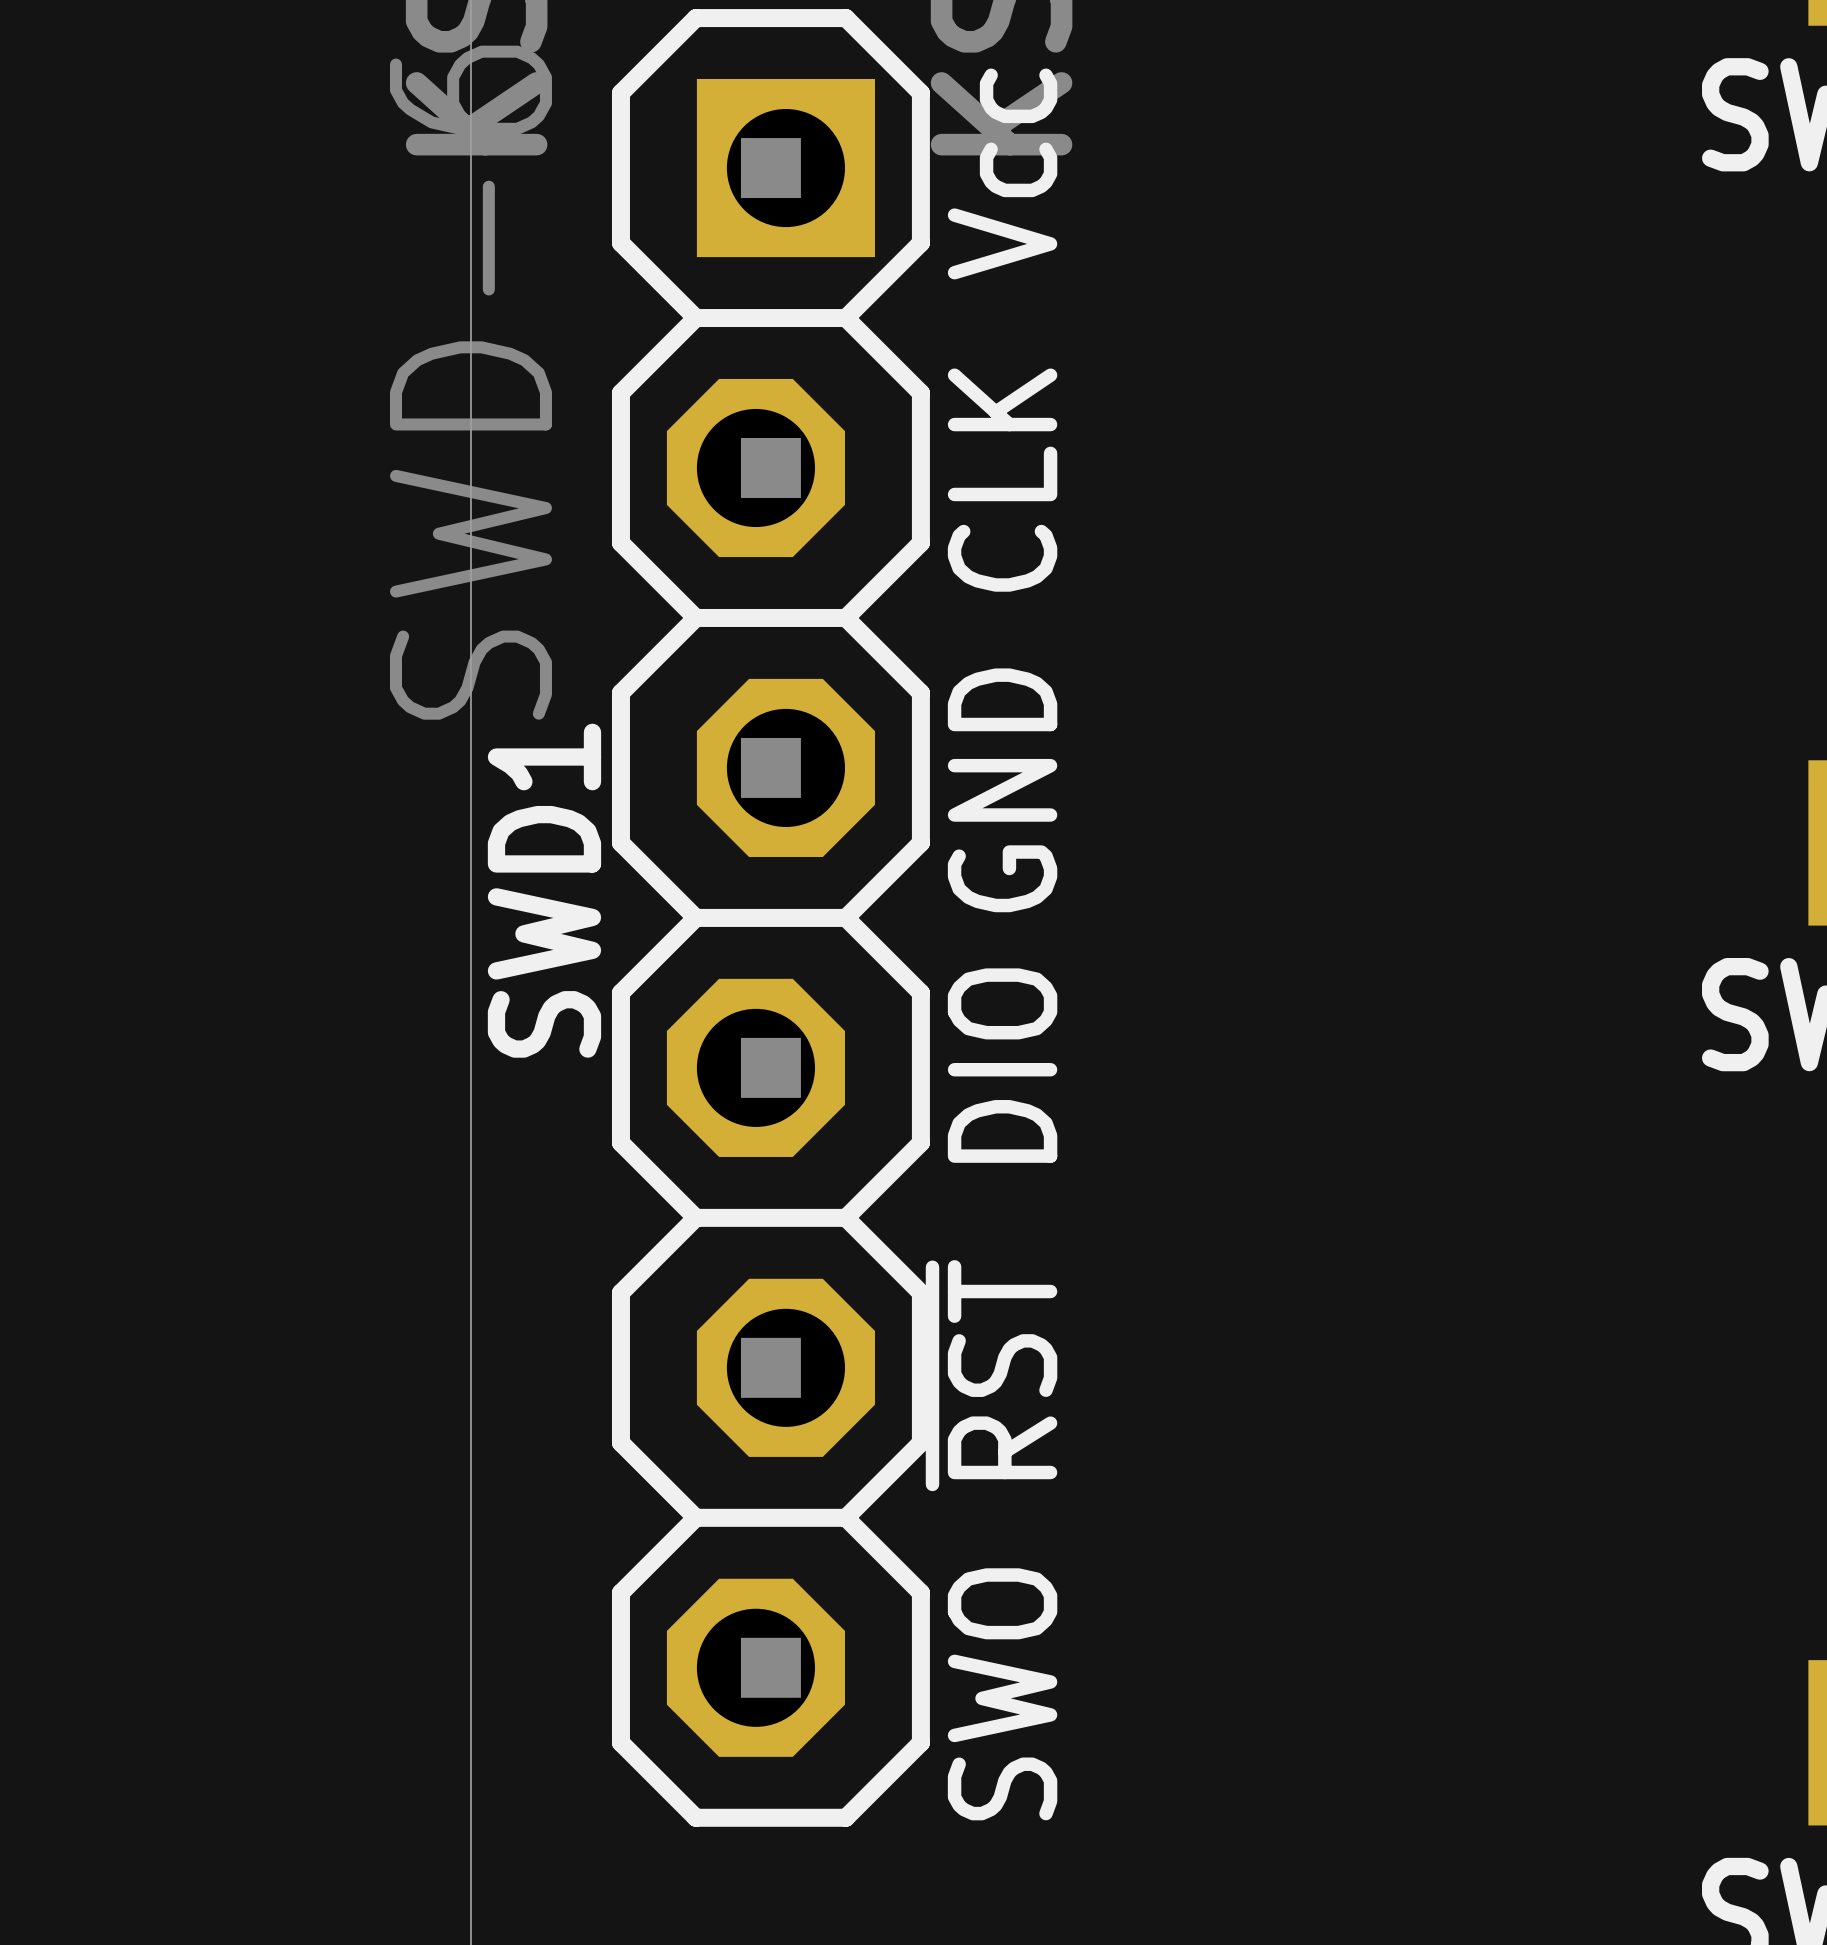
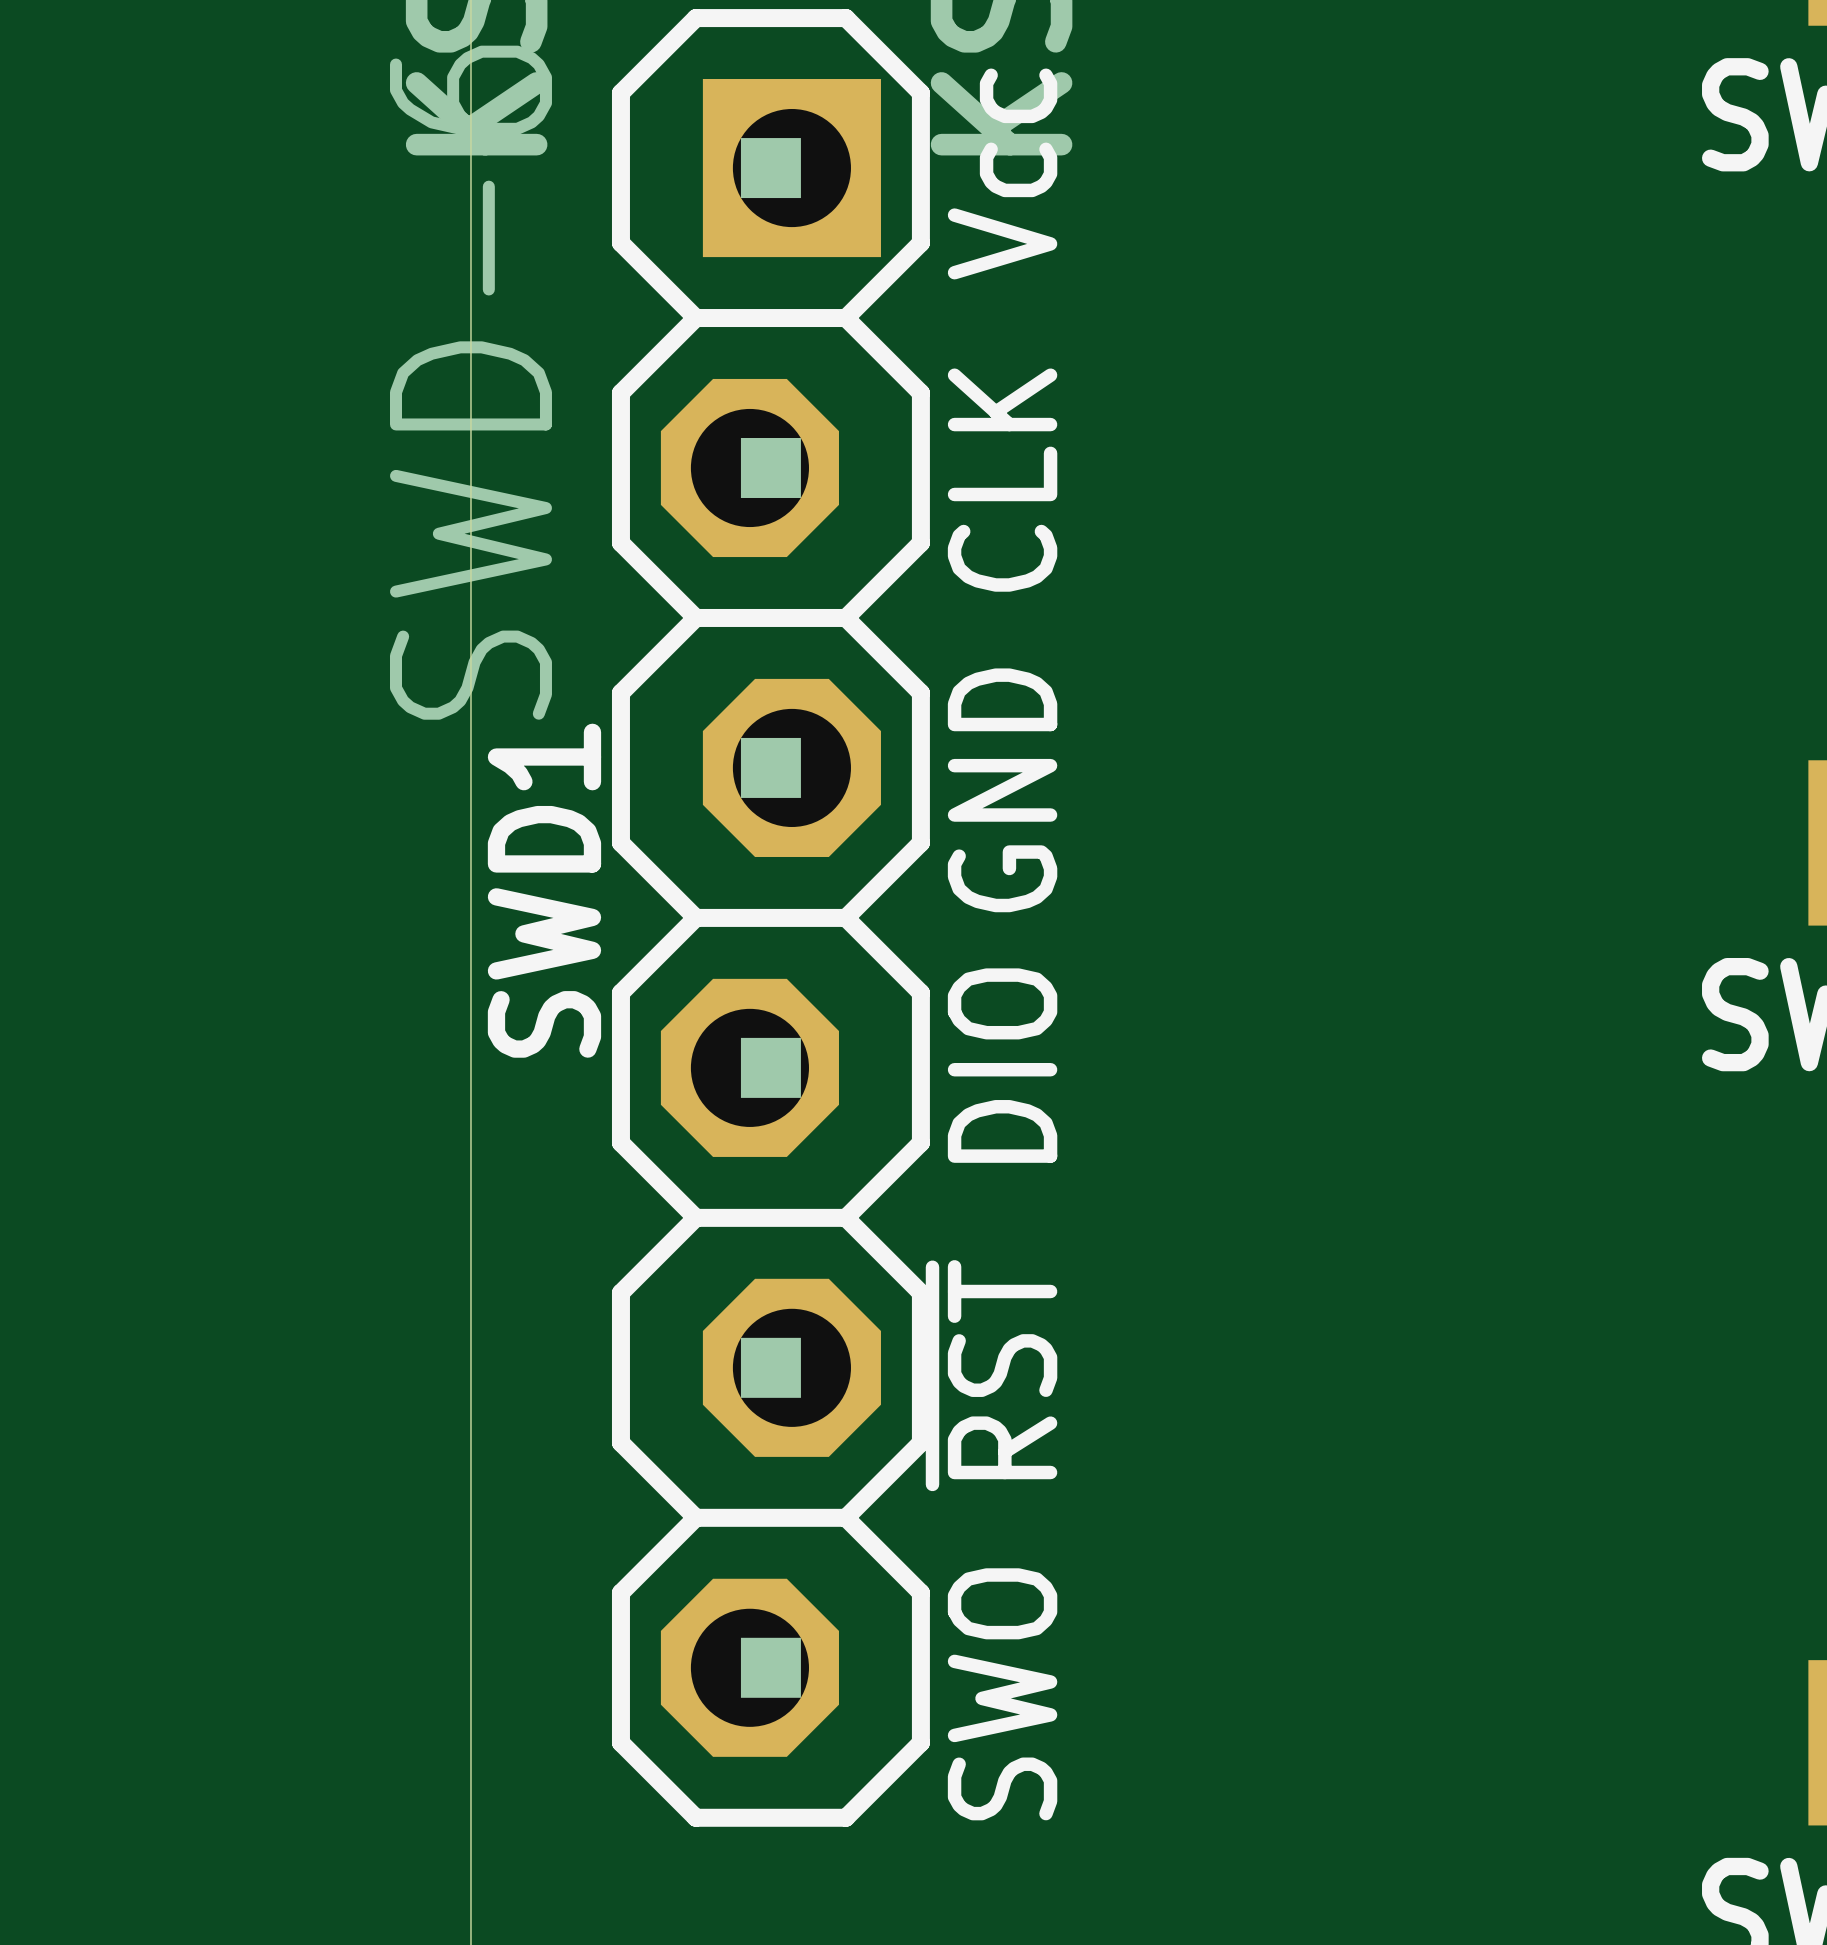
SWD1 footprint: [611, 9, 930, 1827] -> [611, 9, 930, 1827]

